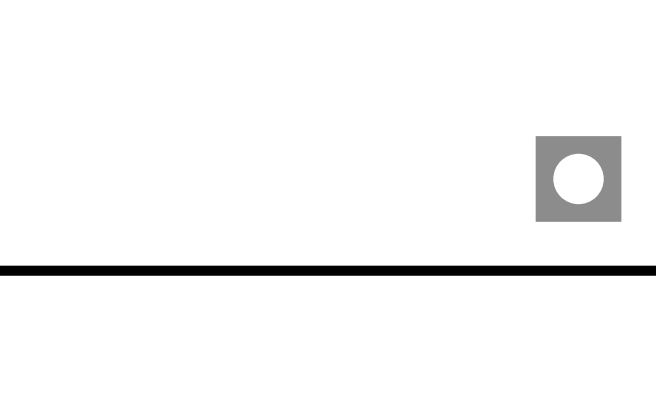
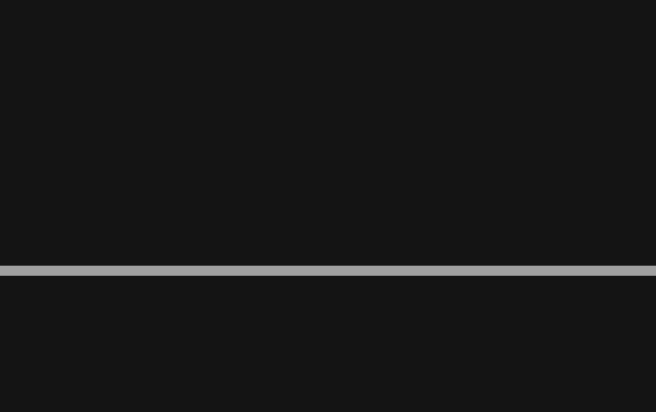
part: (578, 178) -> none

